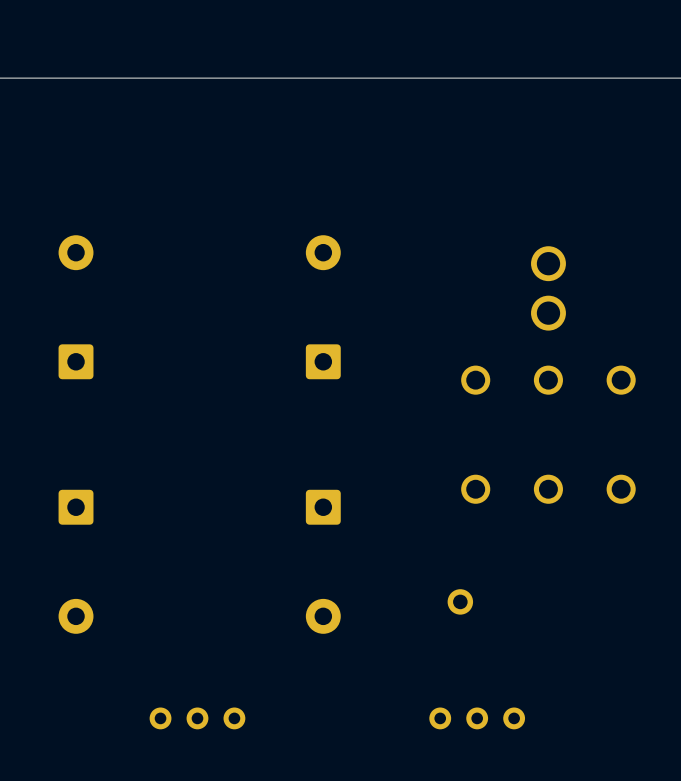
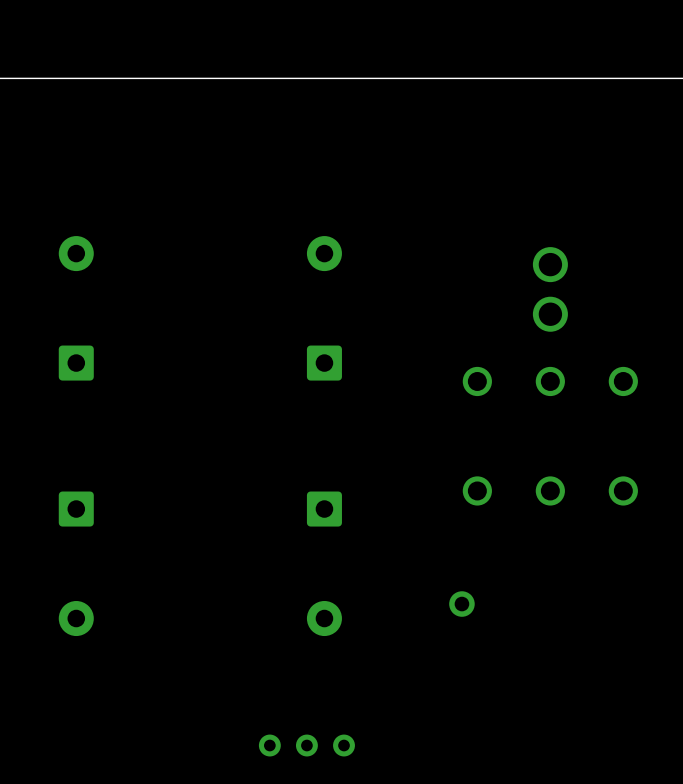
part: (197, 718) -> none
part: (477, 718) -> none
part: none -> (306, 745)

